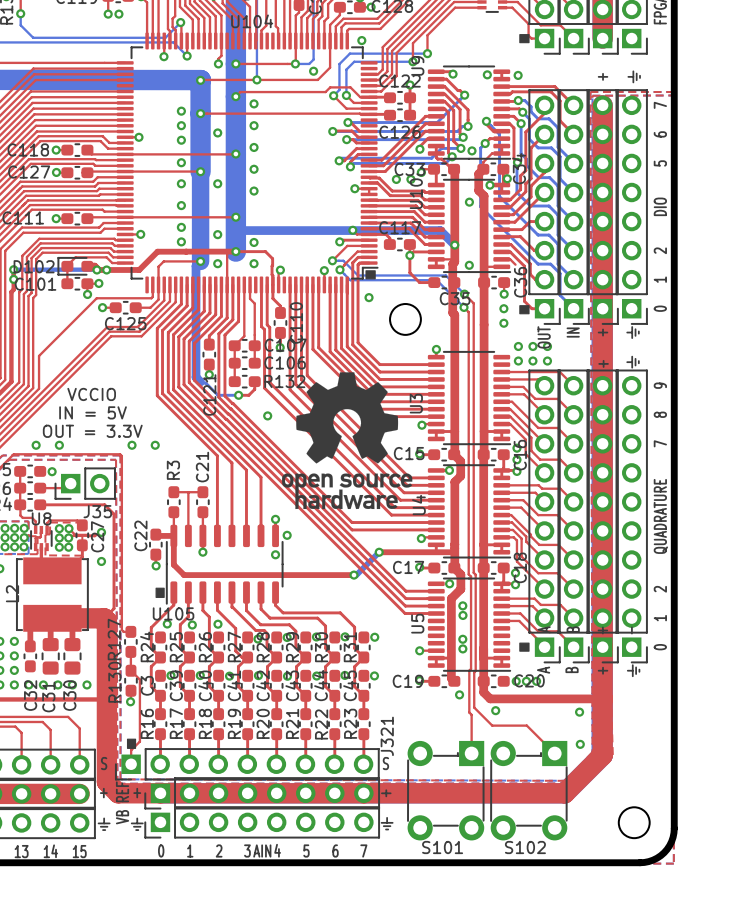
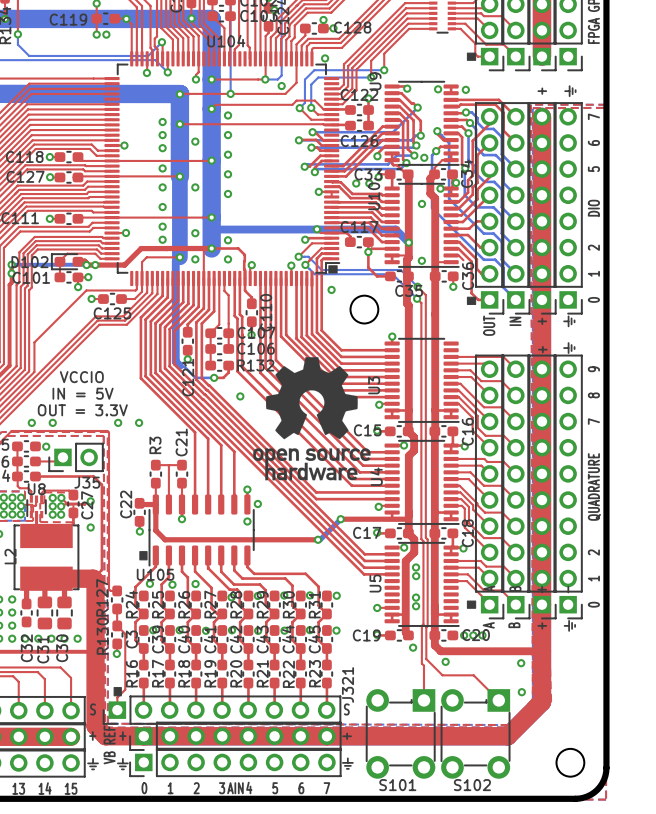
via: (503, 308) -> none
via: (503, 323) -> none
via: (518, 346) -> none
via: (532, 346) -> none
via: (547, 346) -> none
via: (518, 361) -> none
via: (532, 361) -> none
via: (547, 361) -> none
via: (516, 448) -> none
via: (516, 459) -> none
via: (515, 573) -> none

